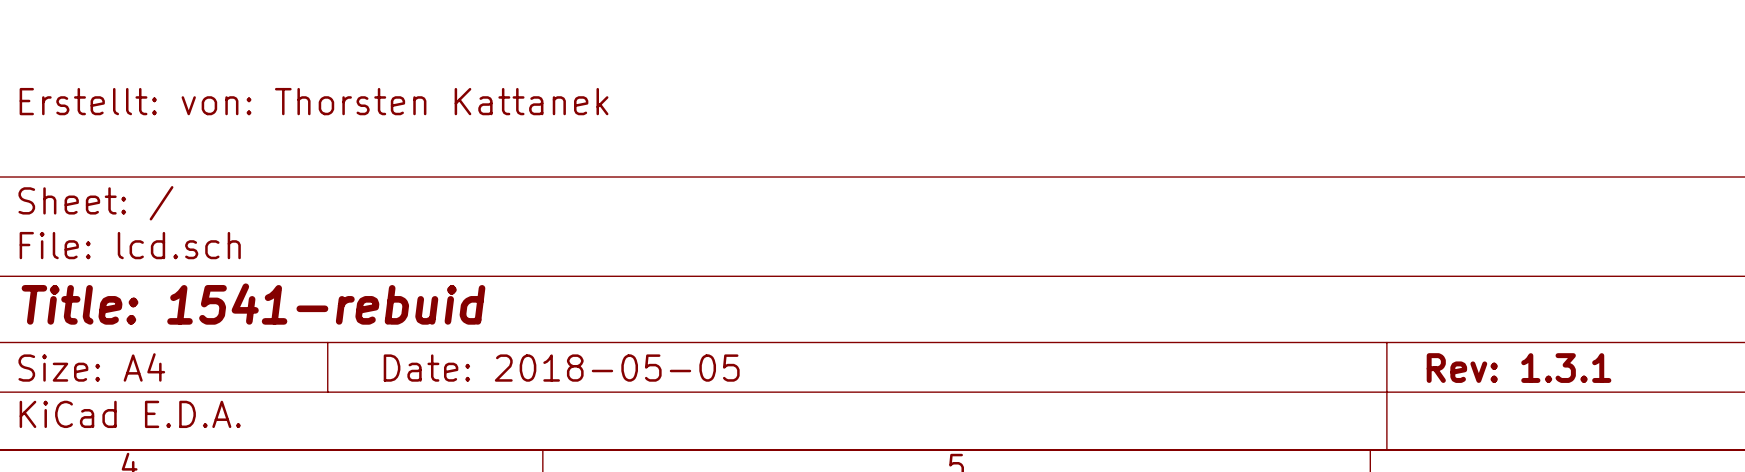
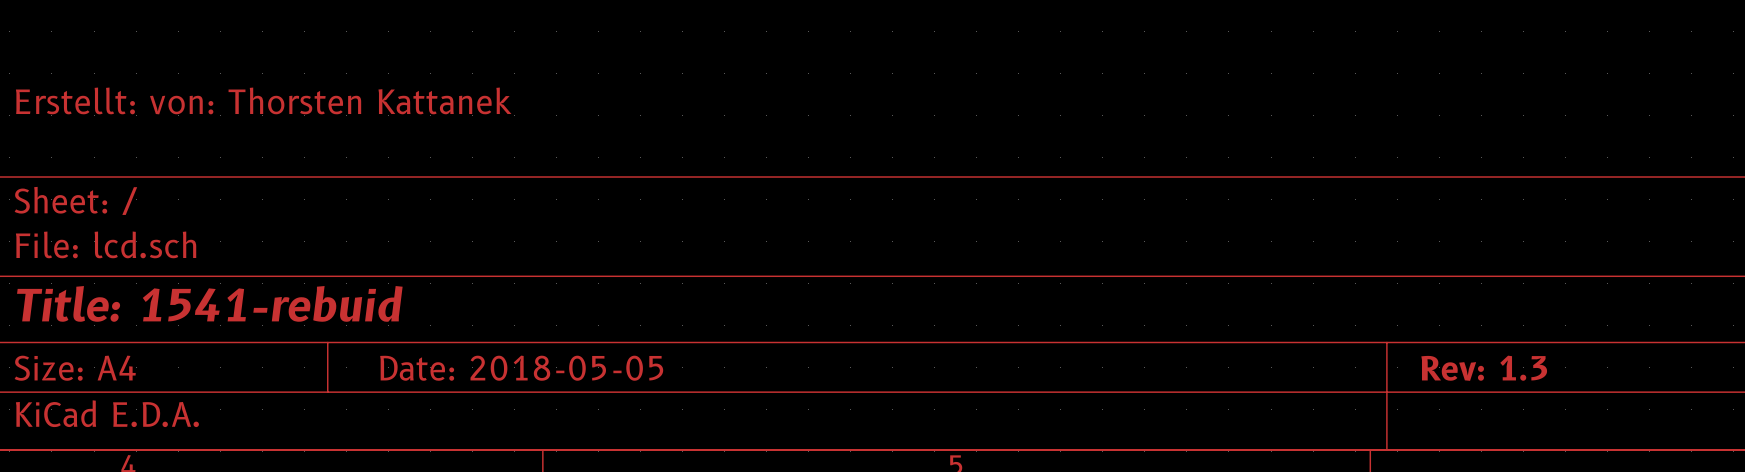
title block: Rev: 1.3.1 (1519, 368) -> Rev: 1.3 (1484, 368)

